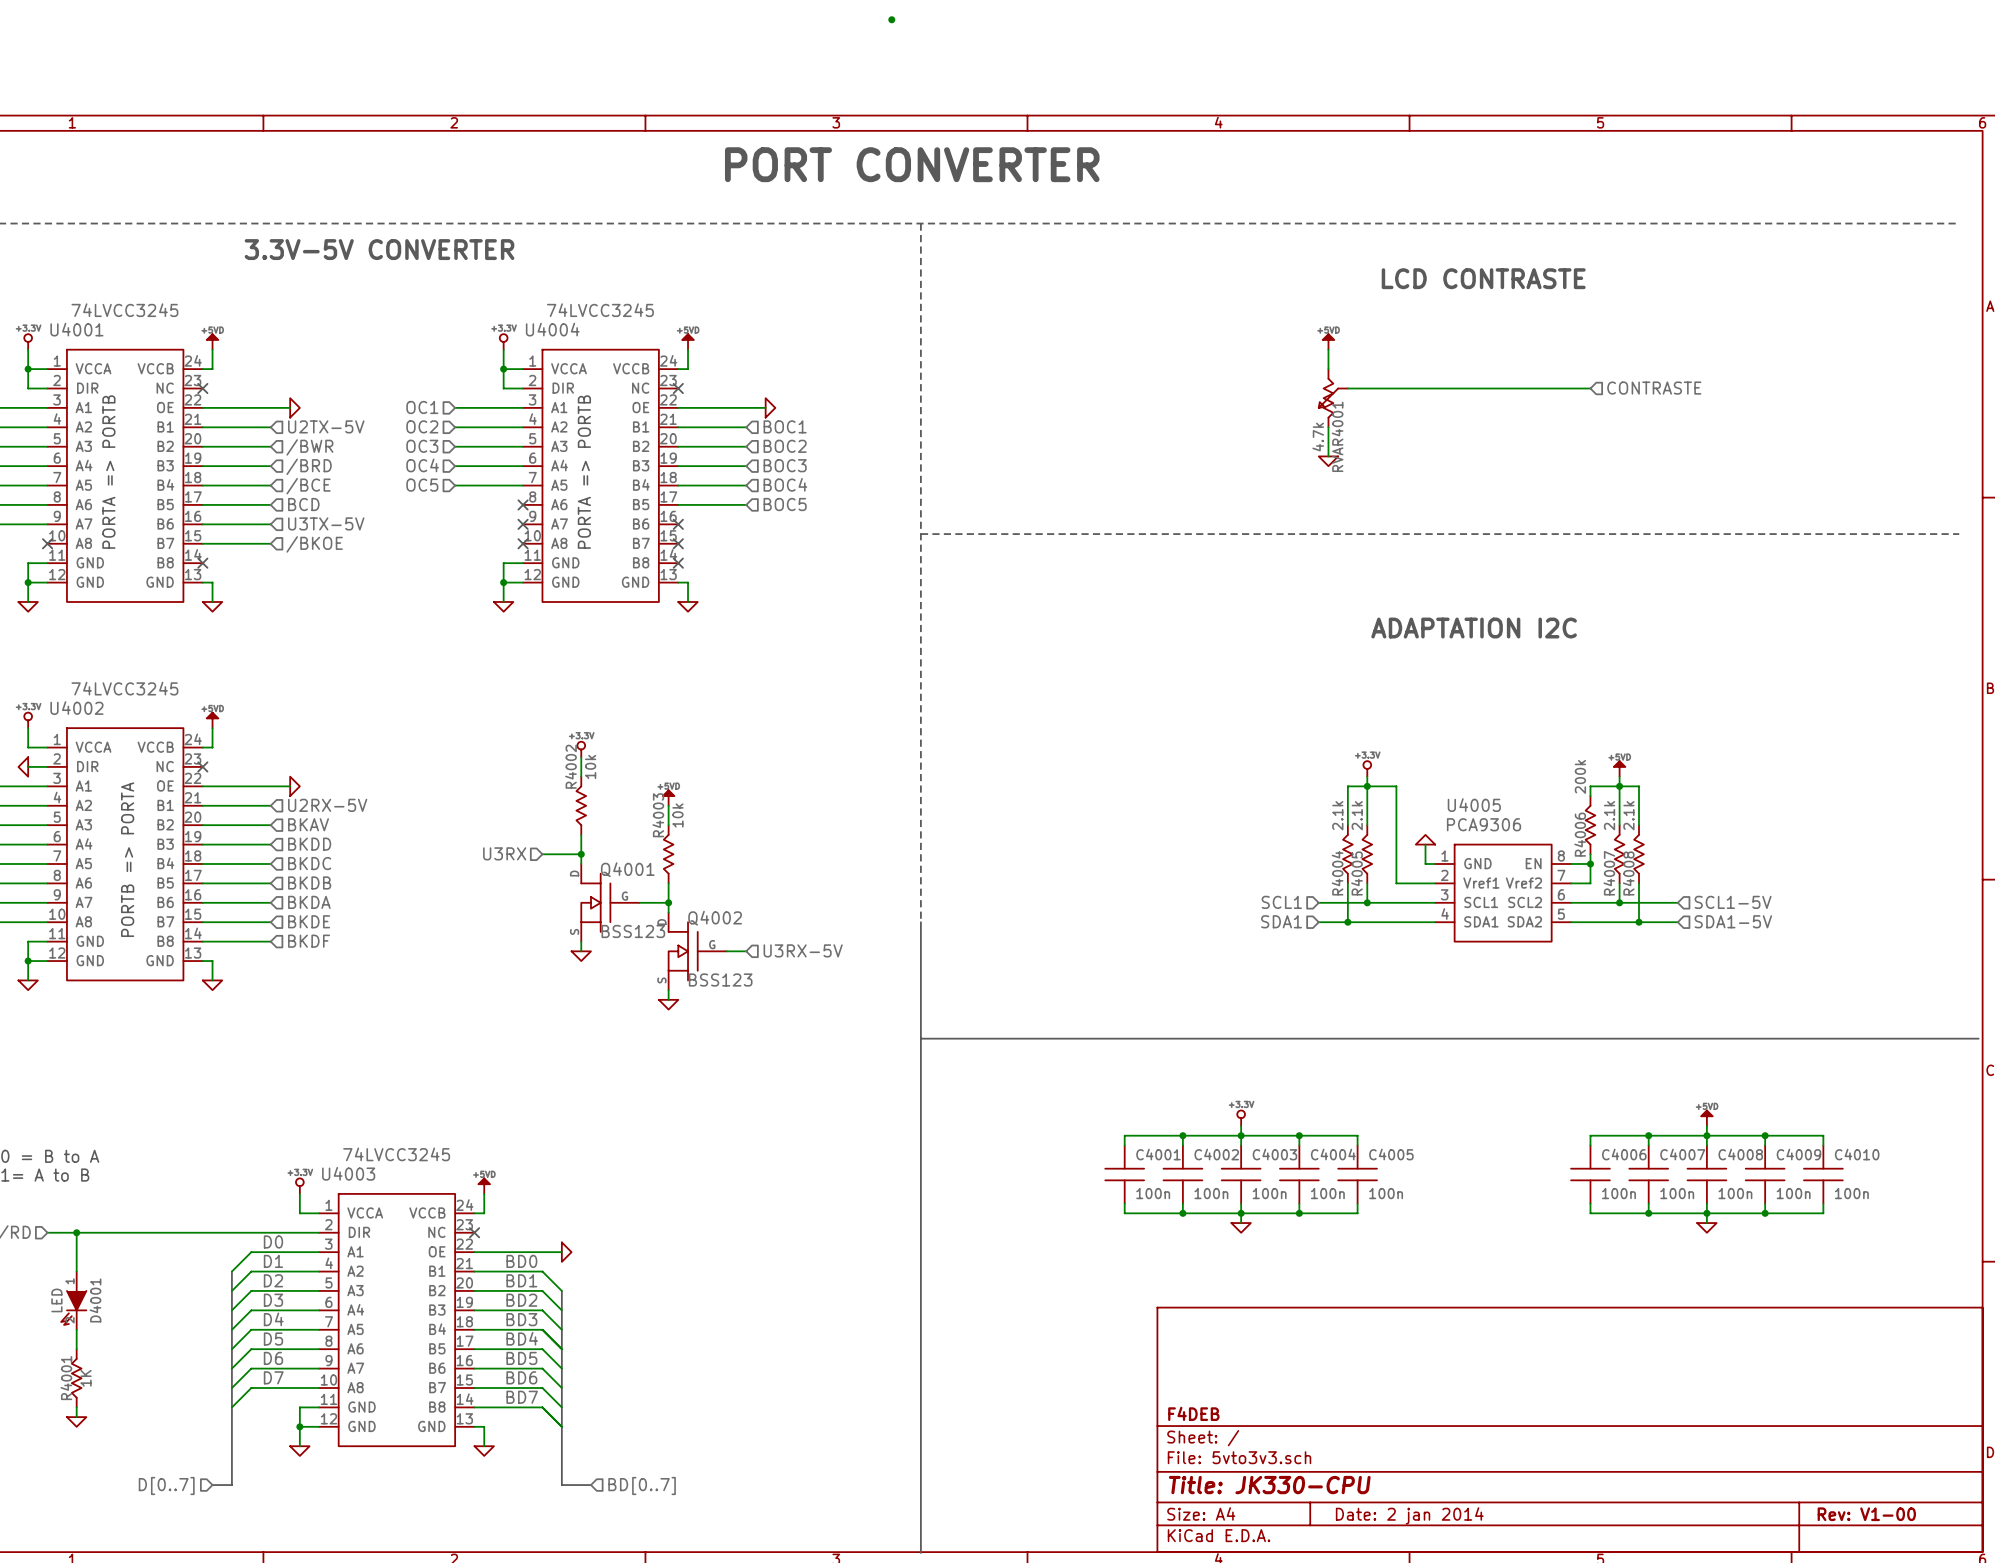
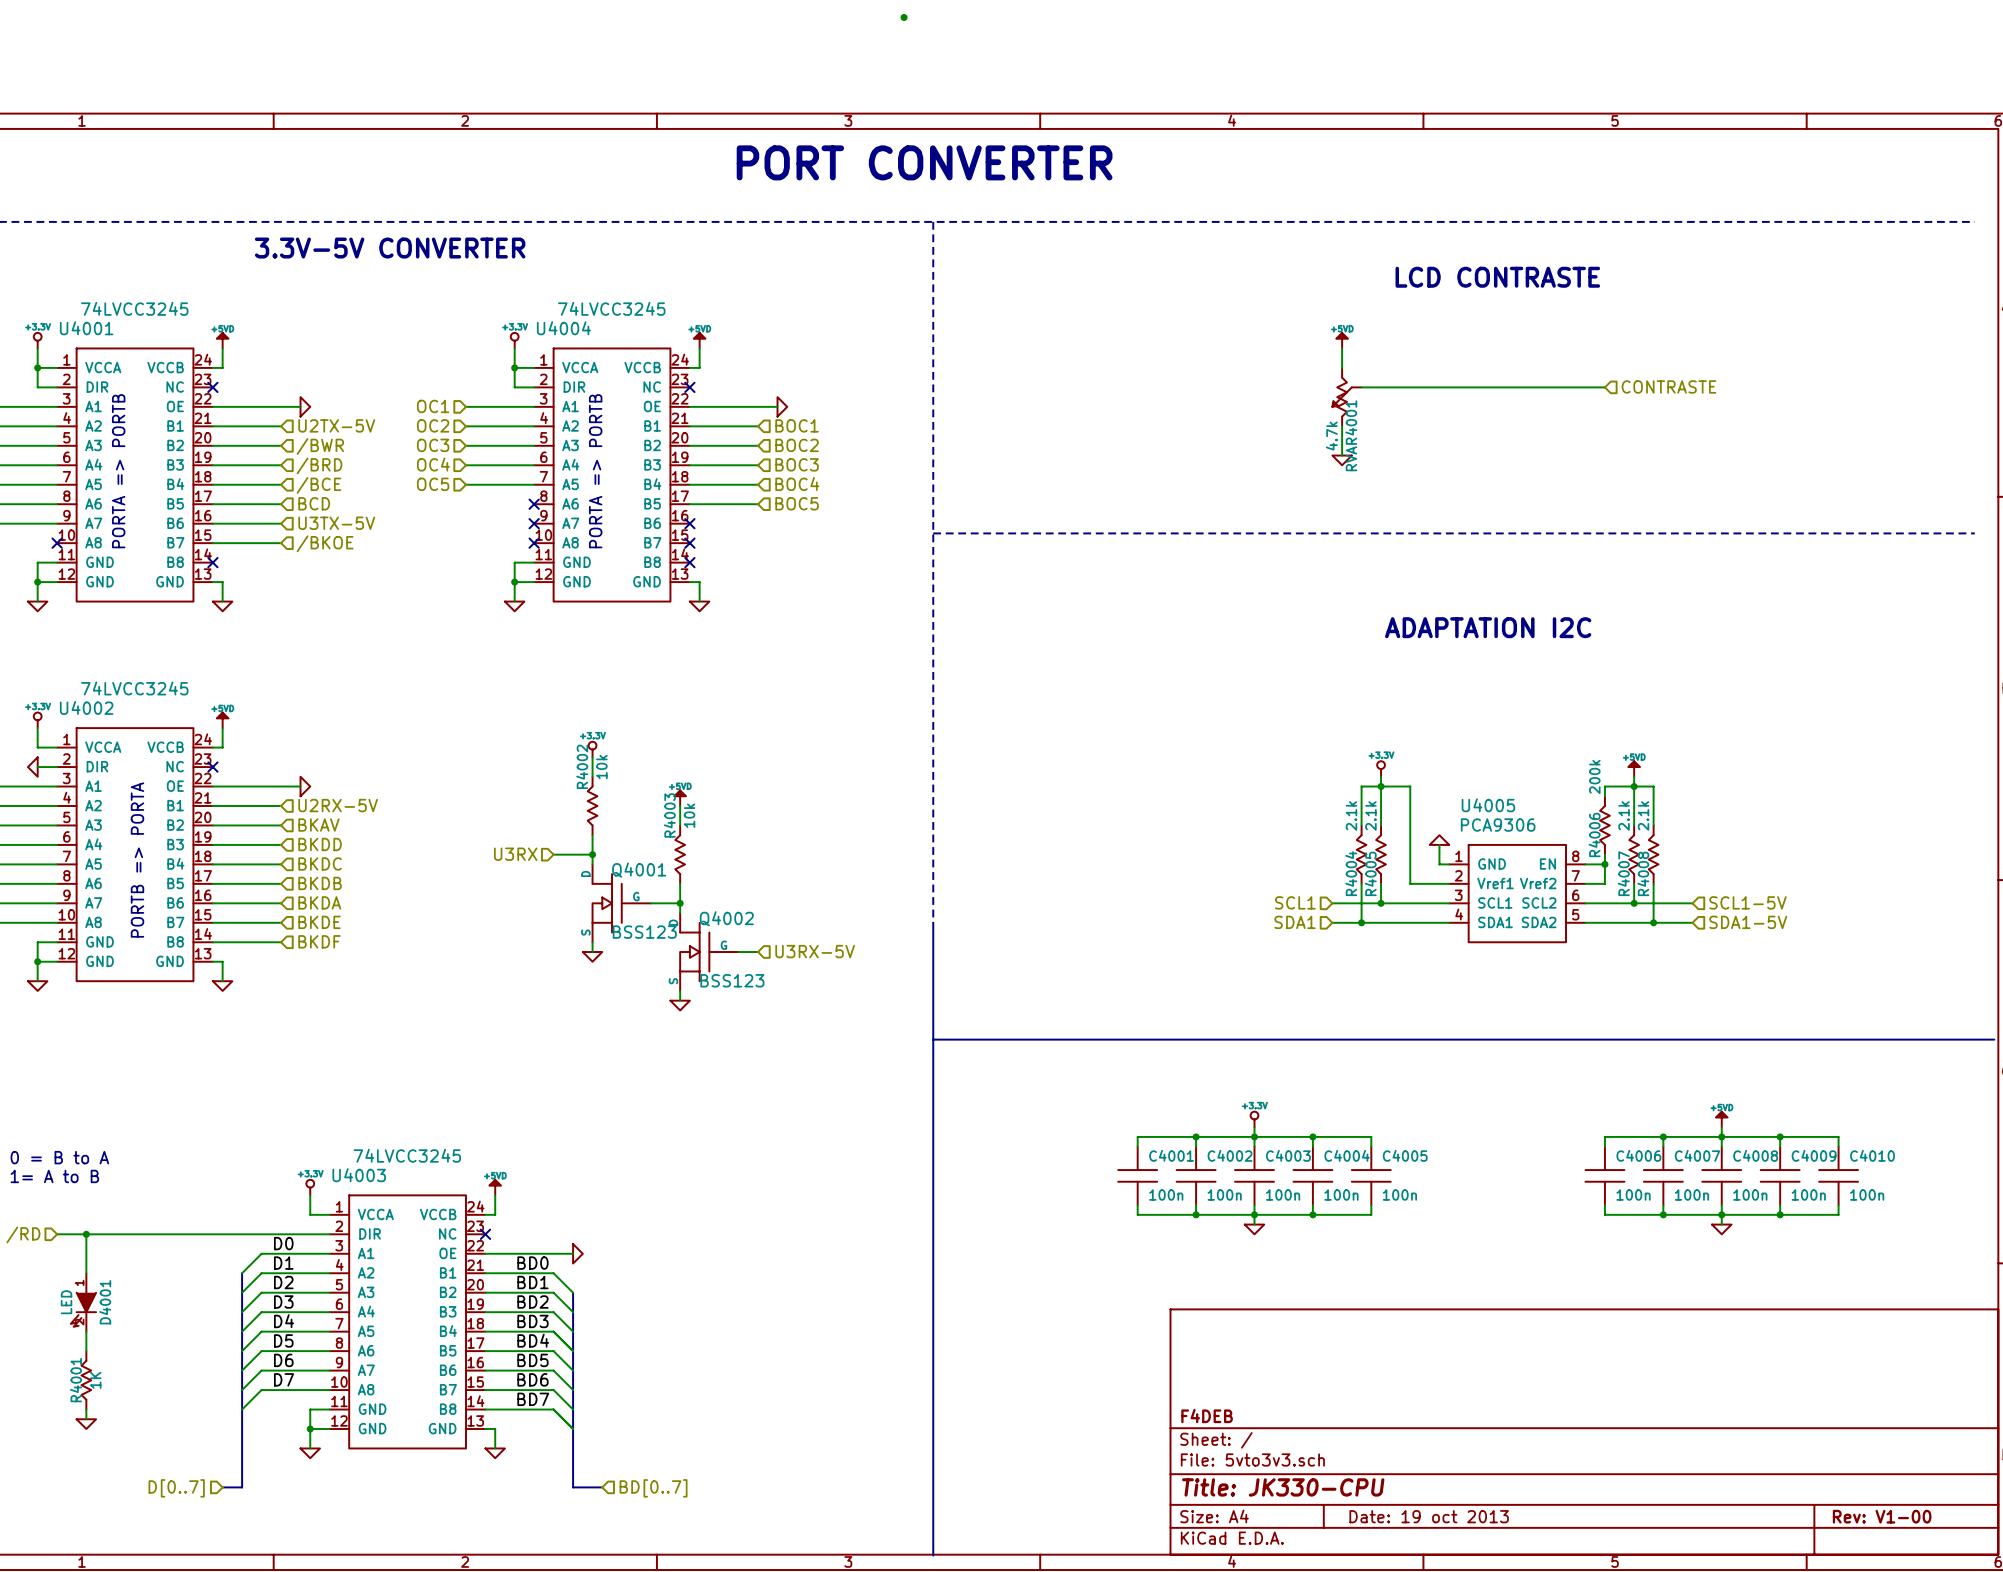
title block: Date: 2 jan 2014 (1409, 1515) -> Date: 19 oct 2013 (1429, 1516)

